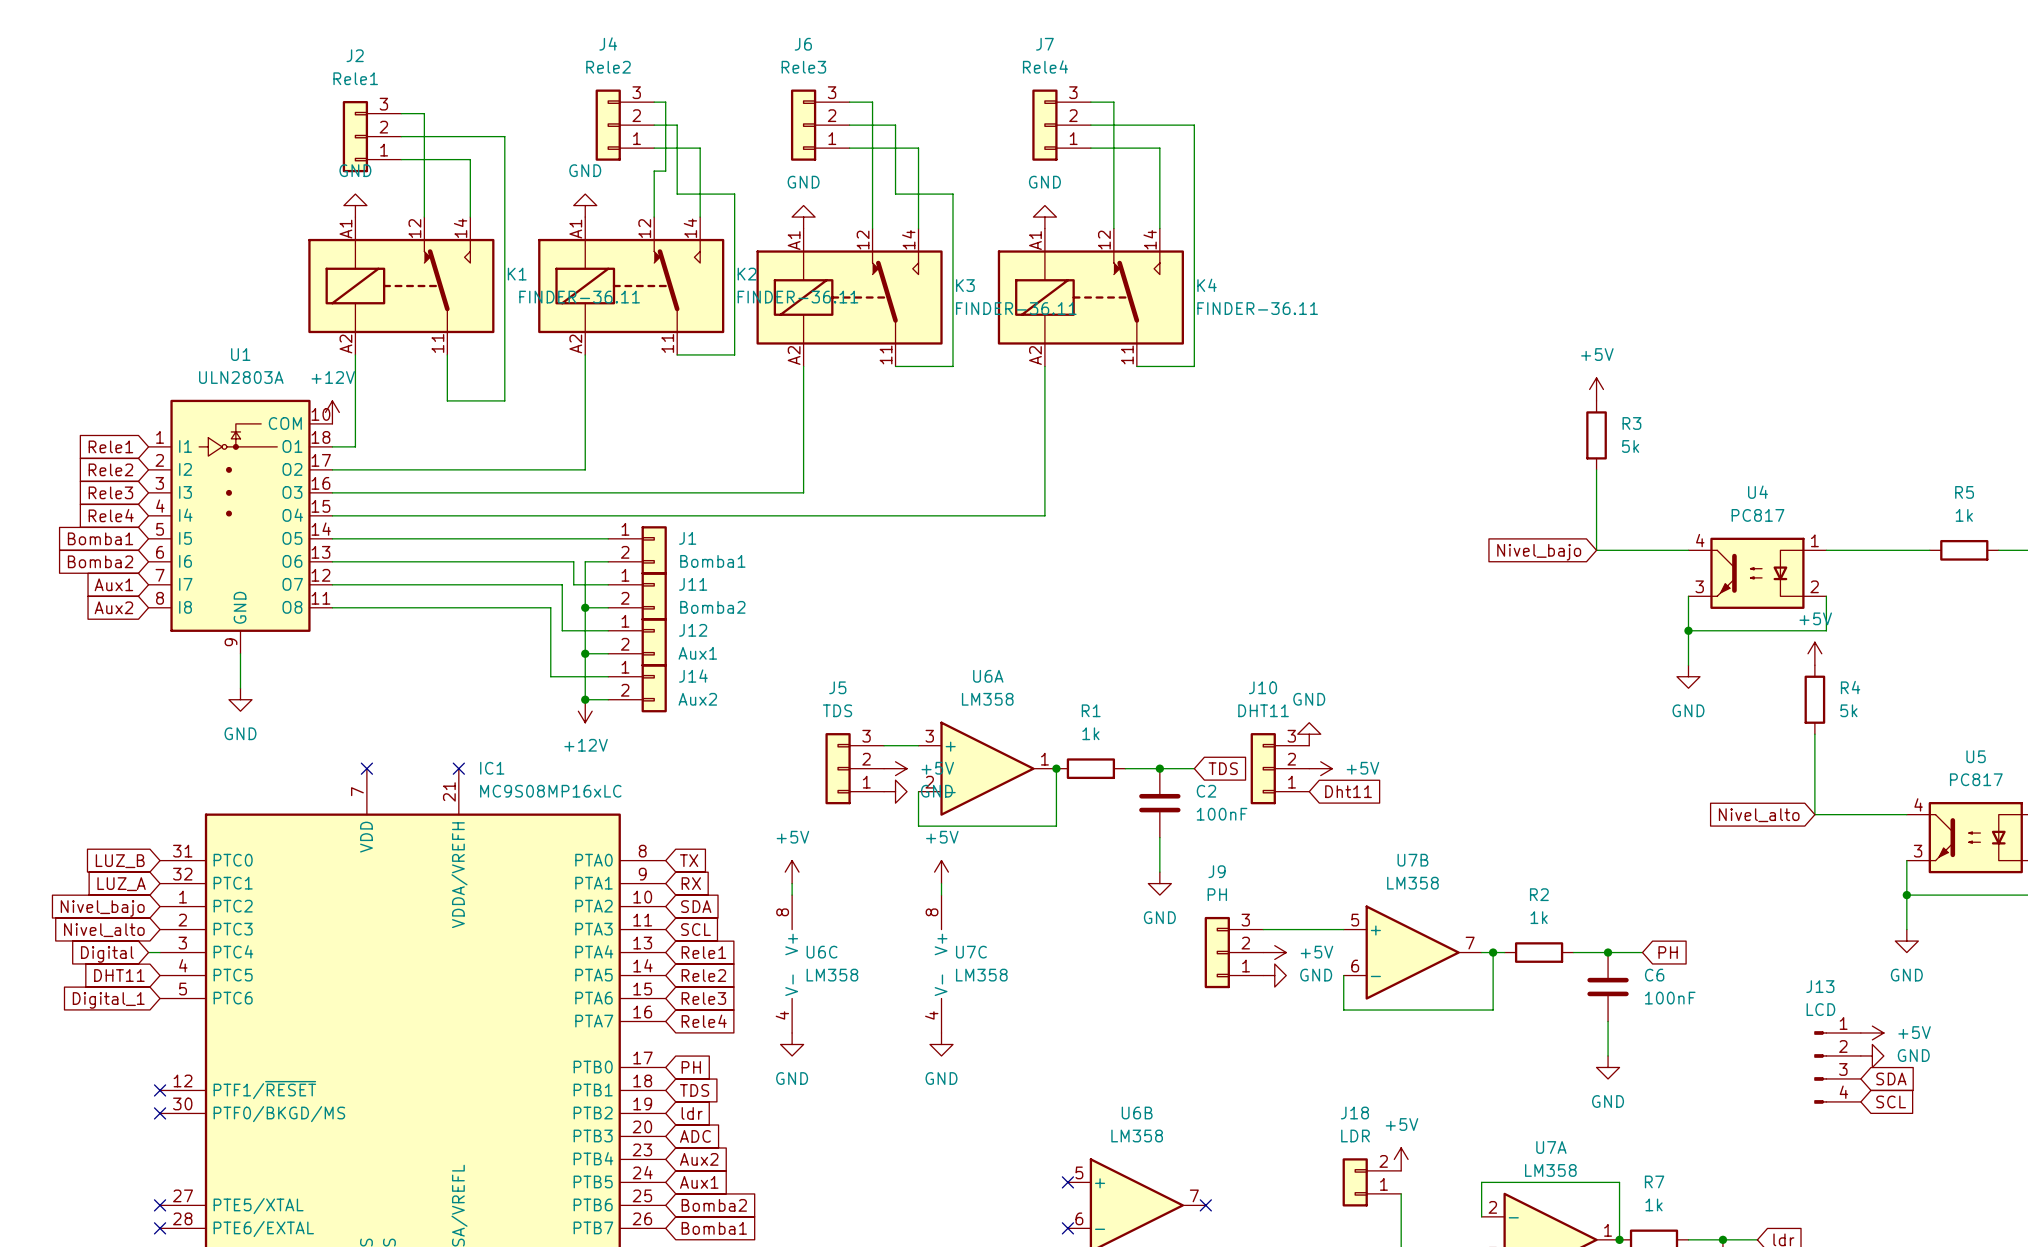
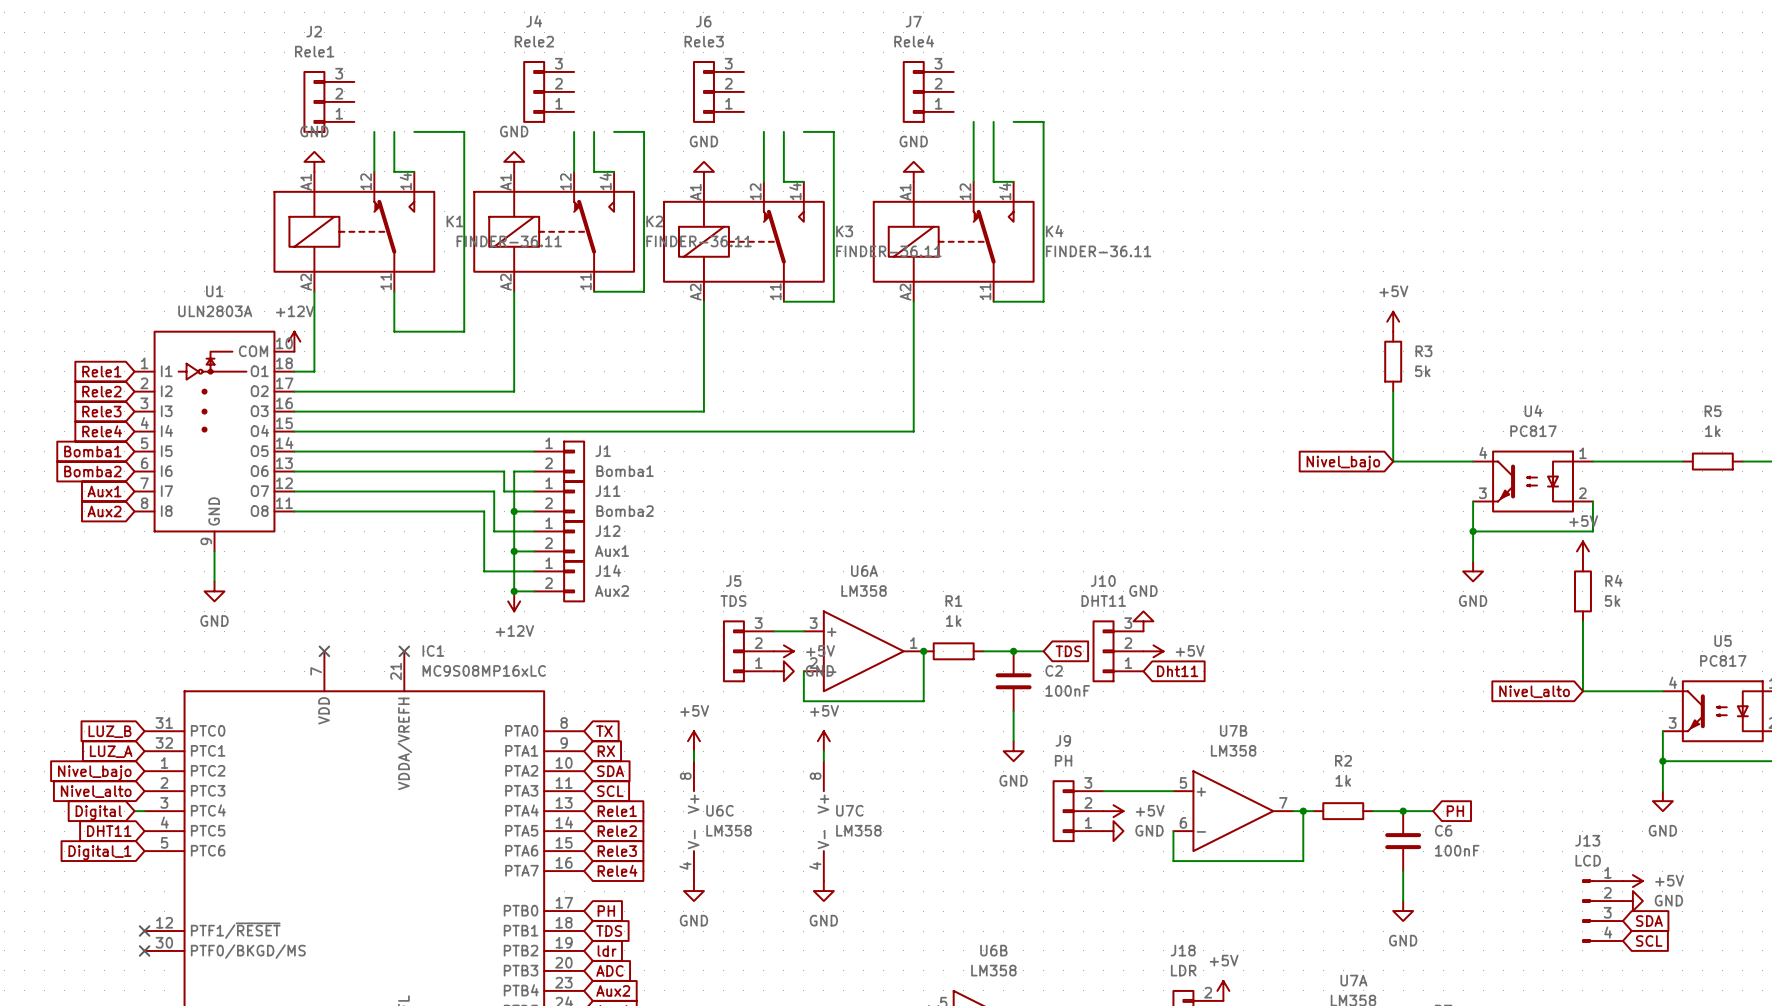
wire: (654, 102) (665, 102) (665, 171) (654, 171) -> none
wire: (849, 102) (872, 102) (872, 171) -> none
wire: (1090, 102) (1113, 102) (1113, 159) -> none
wire: (401, 113) (424, 113) (424, 171) -> none
wire: (654, 125) (677, 125) (677, 171) -> none
wire: (849, 125) (895, 125) (895, 171) -> none
wire: (1090, 125) (1194, 125) (1194, 159) -> (1013, 121) (1043, 121)
wire: (401, 136) (504, 136) (504, 400) -> (414, 131) (464, 131) (464, 331) (444, 331)
wire: (654, 148) (700, 148) (700, 217) -> (594, 151) (594, 171) (614, 171)
wire: (849, 148) (918, 148) (918, 228) -> (783, 151) (783, 181) (803, 181)
wire: (1090, 148) (1159, 148) (1159, 228) -> (993, 121) (993, 181) (1013, 181)
wire: (401, 159) (470, 159) (470, 217) -> (394, 131) (394, 171) (414, 171)
wire: (677, 194) (734, 194) -> (614, 131) (644, 131) (644, 151)
wire: (895, 194) (952, 194) -> (803, 131) (833, 131) (833, 151)

